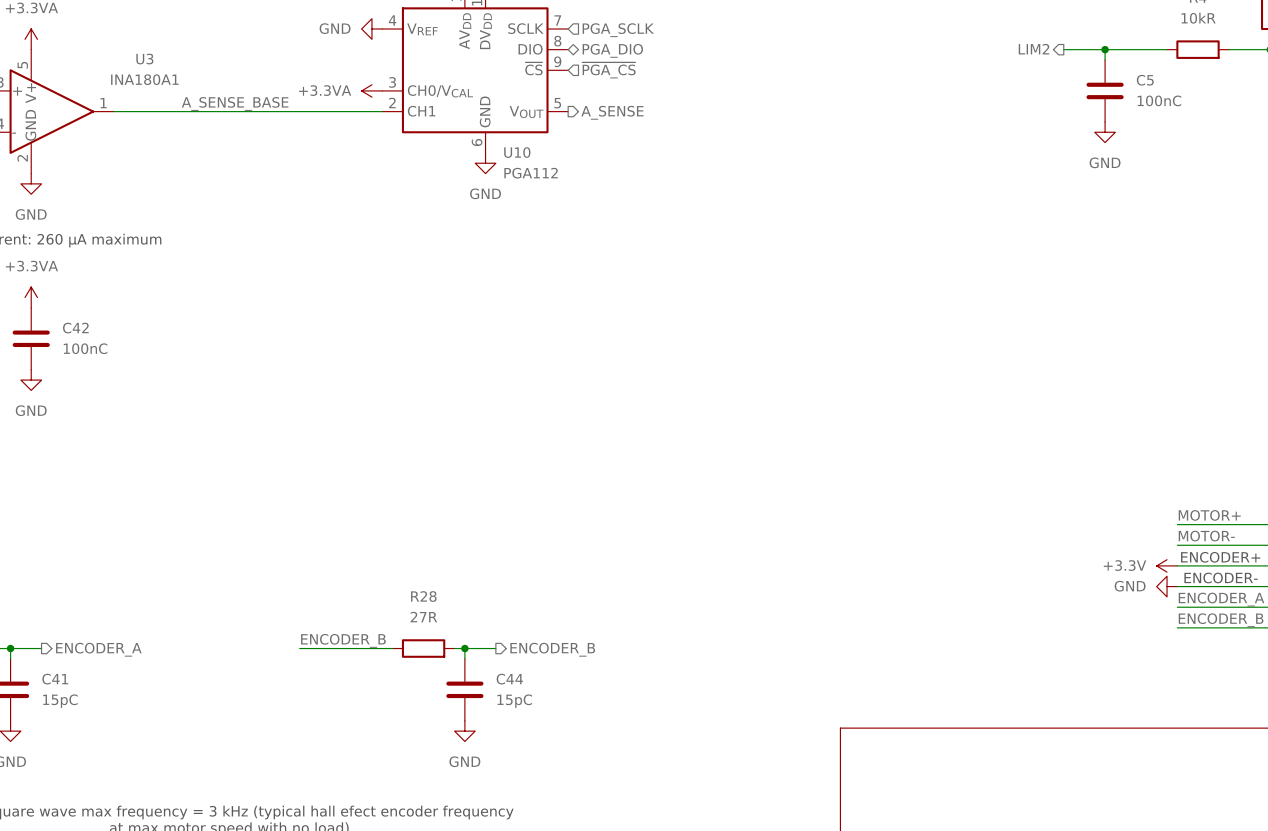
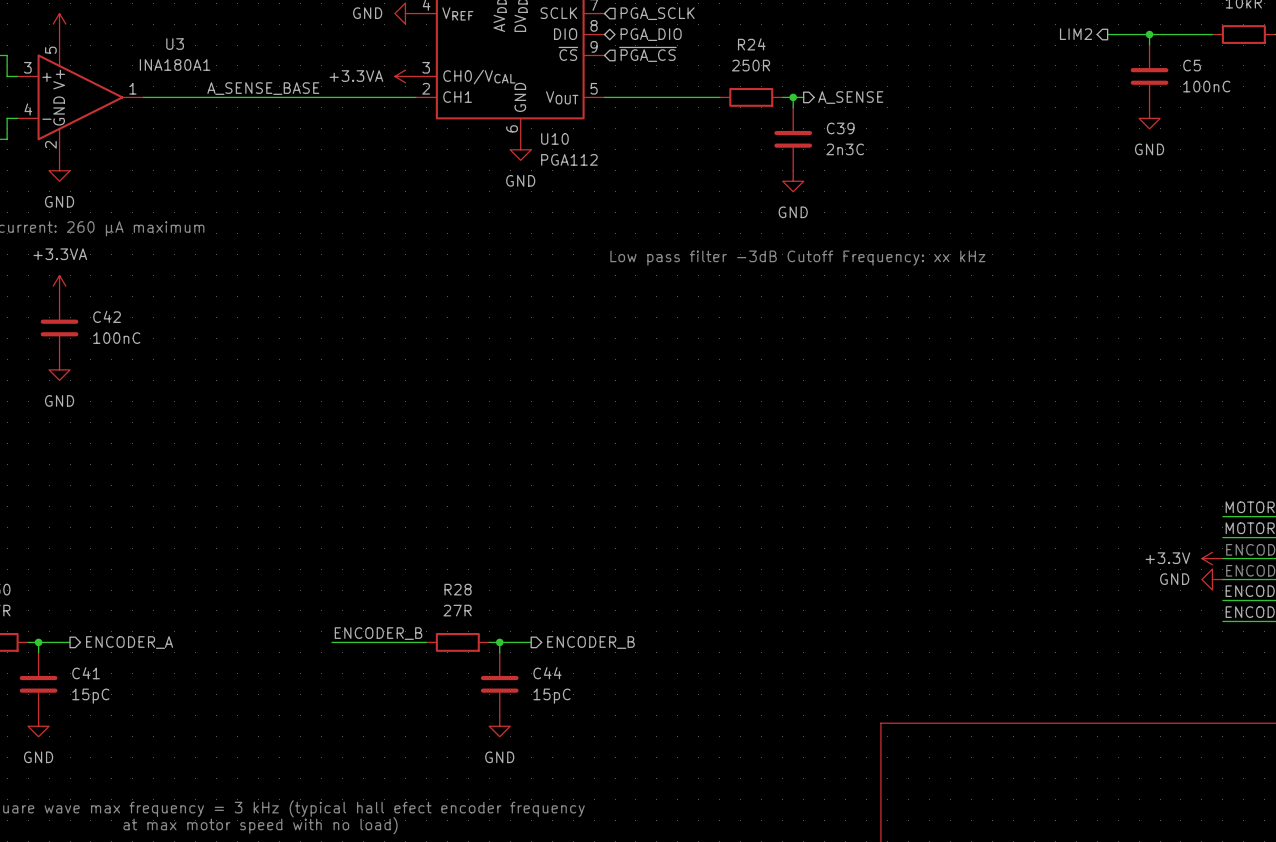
wire: none -> (604, 97) (719, 97)
R24: none -> 250R (751, 97)
wire: none -> (782, 97) (803, 97)
wire: none -> (793, 97) (793, 107)
junction: none -> (793, 97)
hierarchical label position: A_SENSE (612, 112) -> A_SENSE (850, 97)
C39: none -> 2n3C (793, 139)
power symbol: none -> GND (793, 181)
text: none -> Low pass filter -3dB Cutoff Frequency: xx kHz (797, 258)

